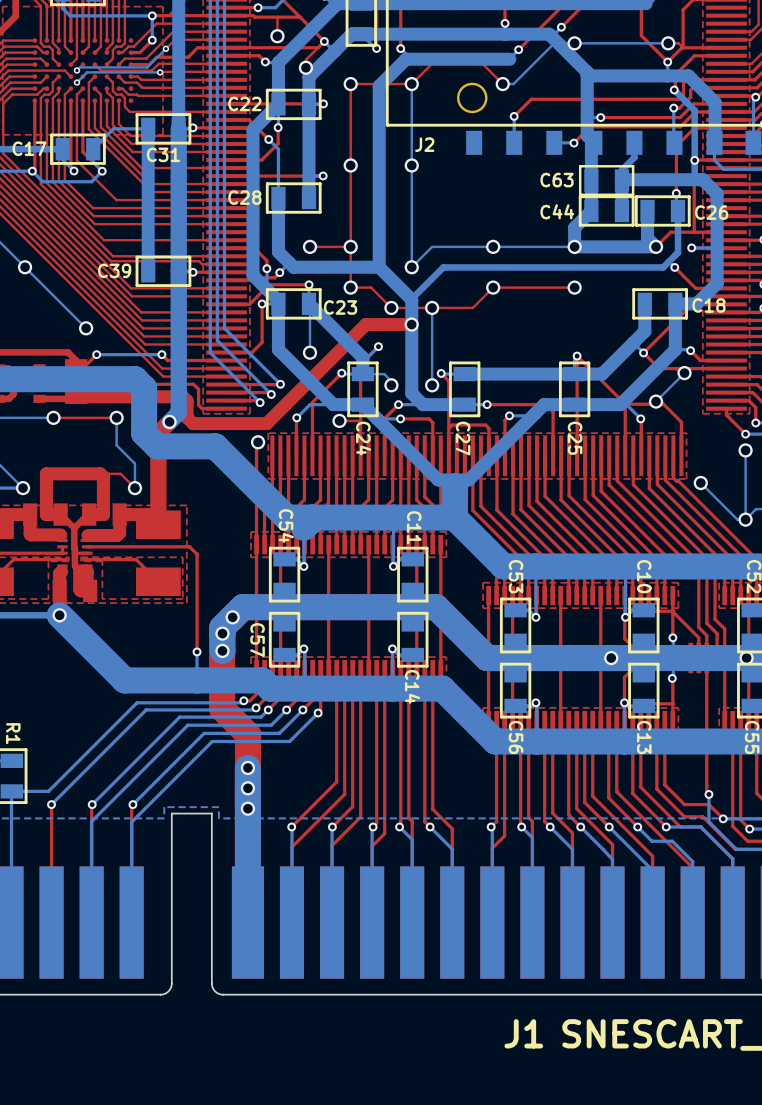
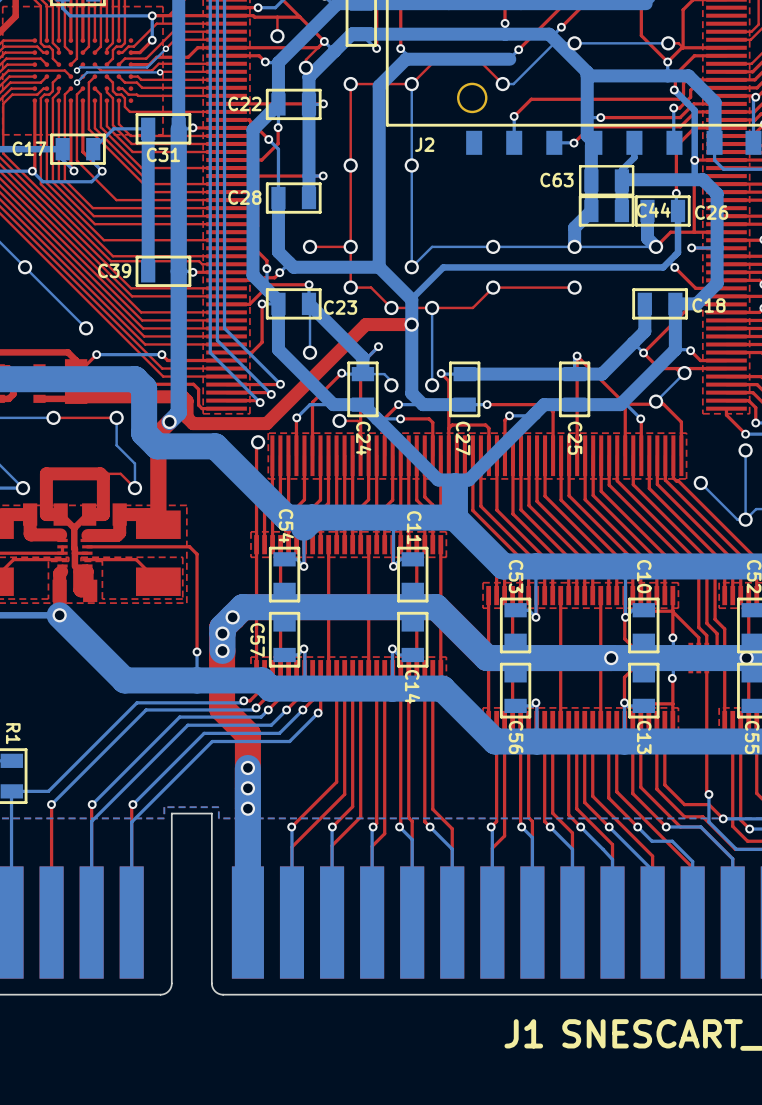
C44 name position: C44 (557, 211) -> C44 (653, 210)
bottom track width: thick (656, 246) (574, 246) -> thin (656, 246) (574, 246)

